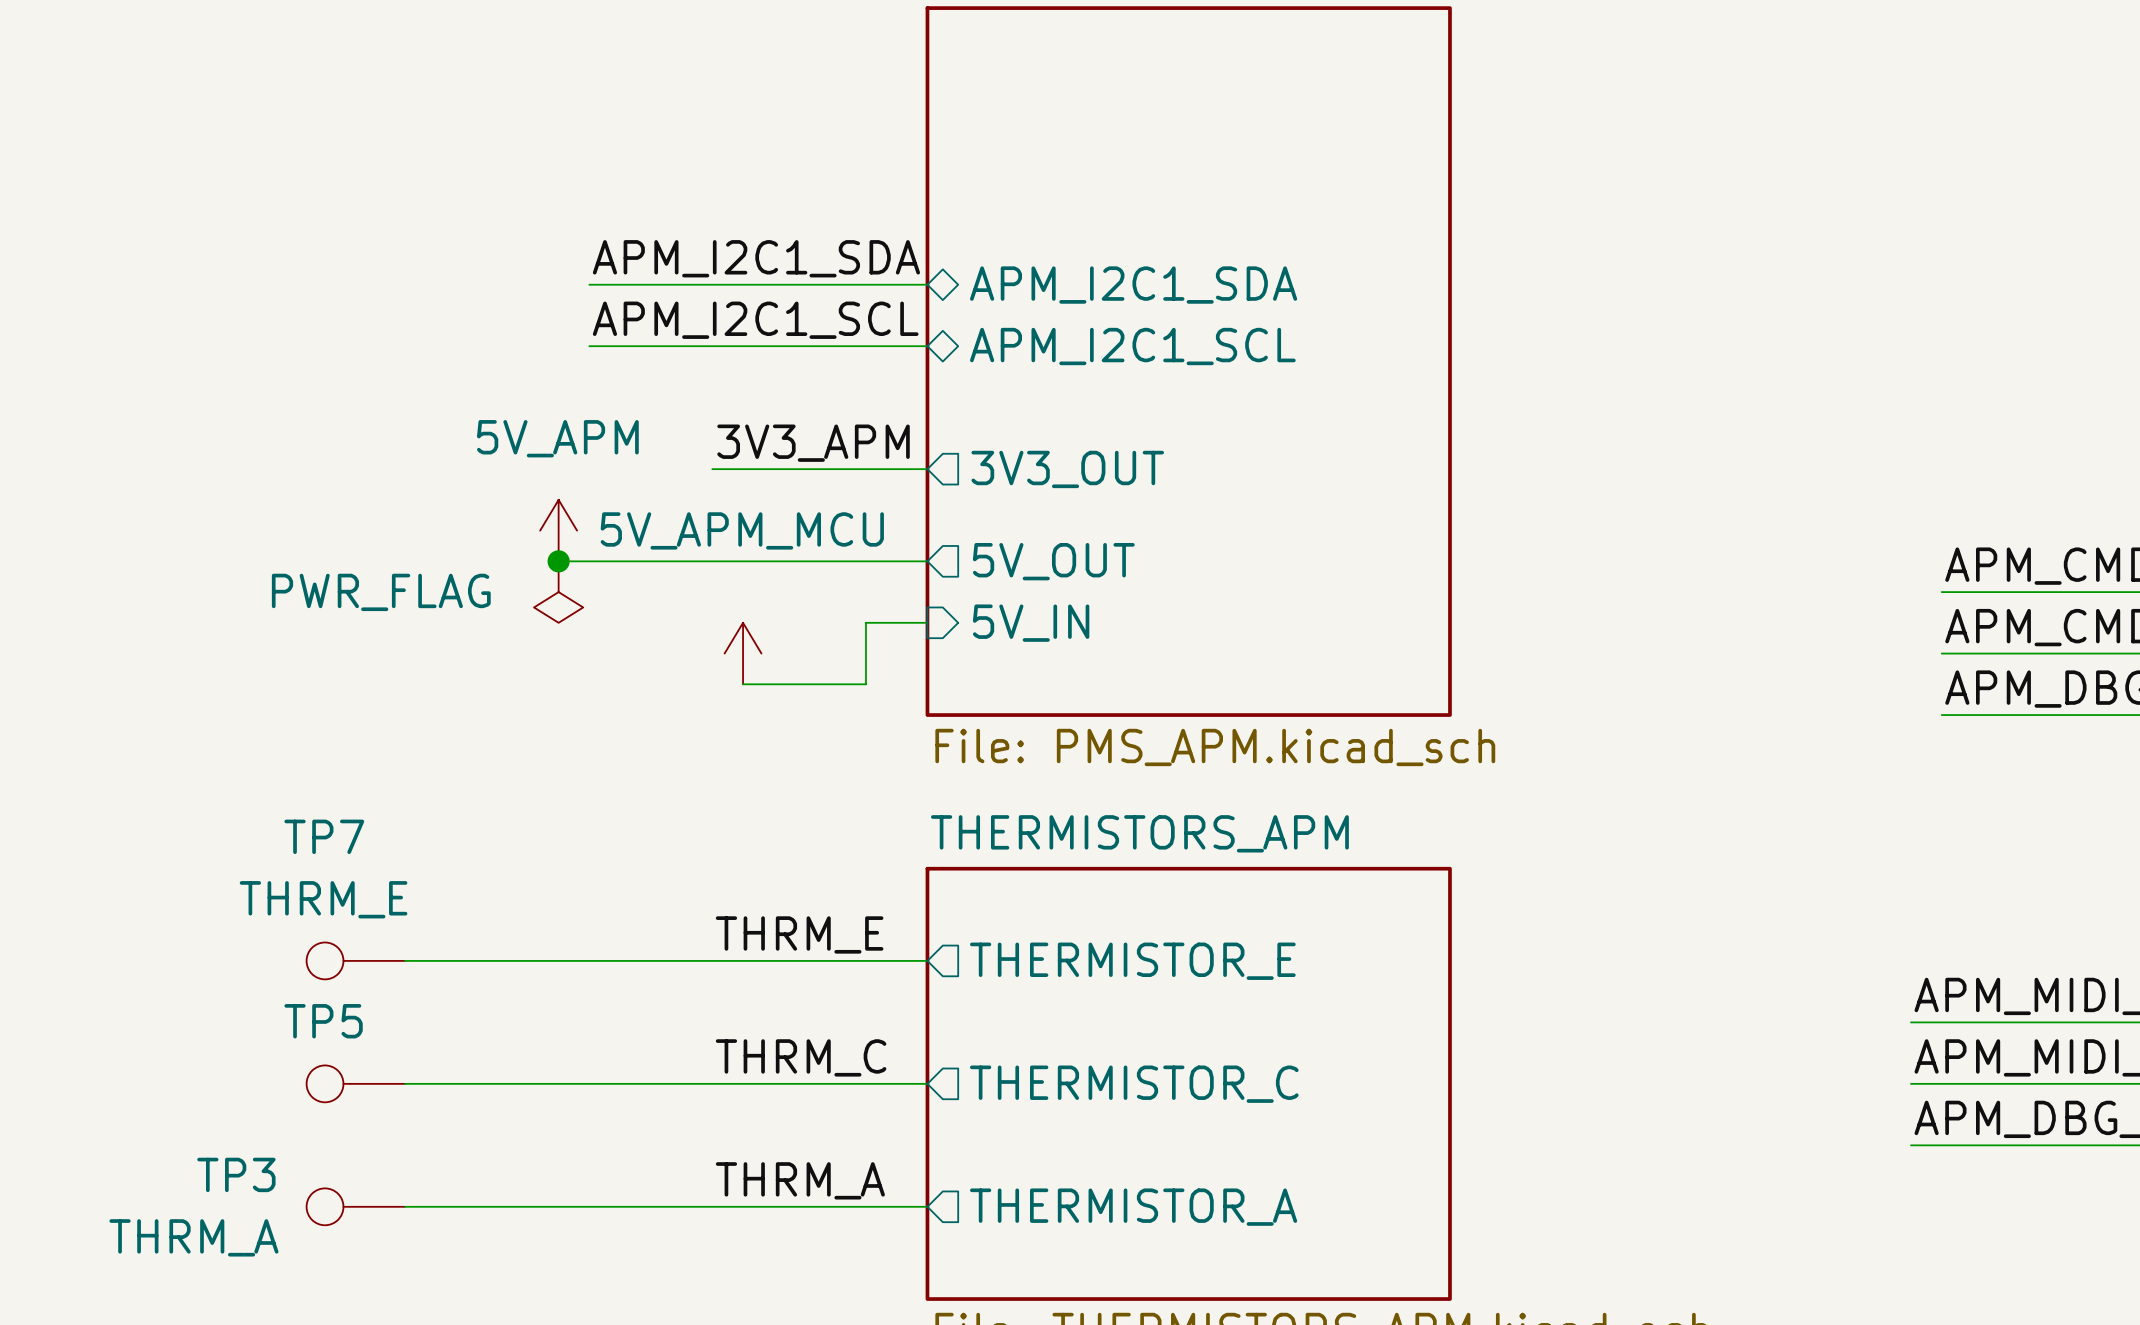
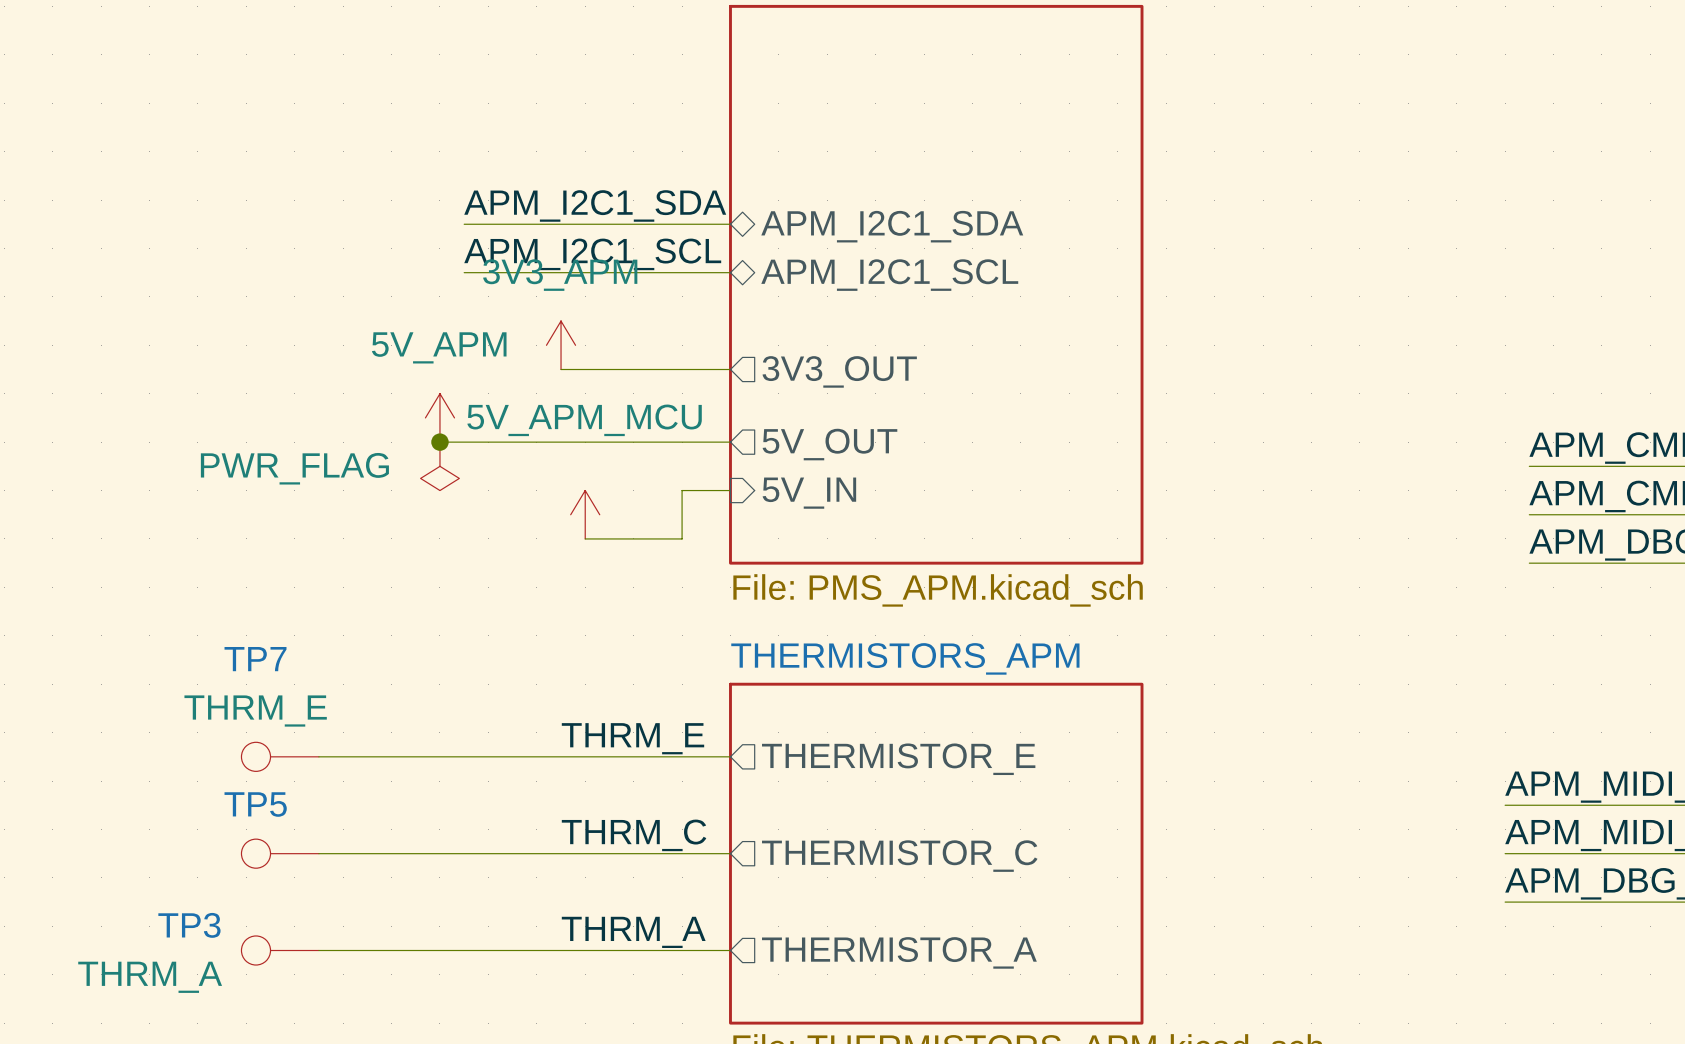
power symbol: none -> 3V3_APM (561, 345)
label: 3V3_APM (813, 443) -> none

